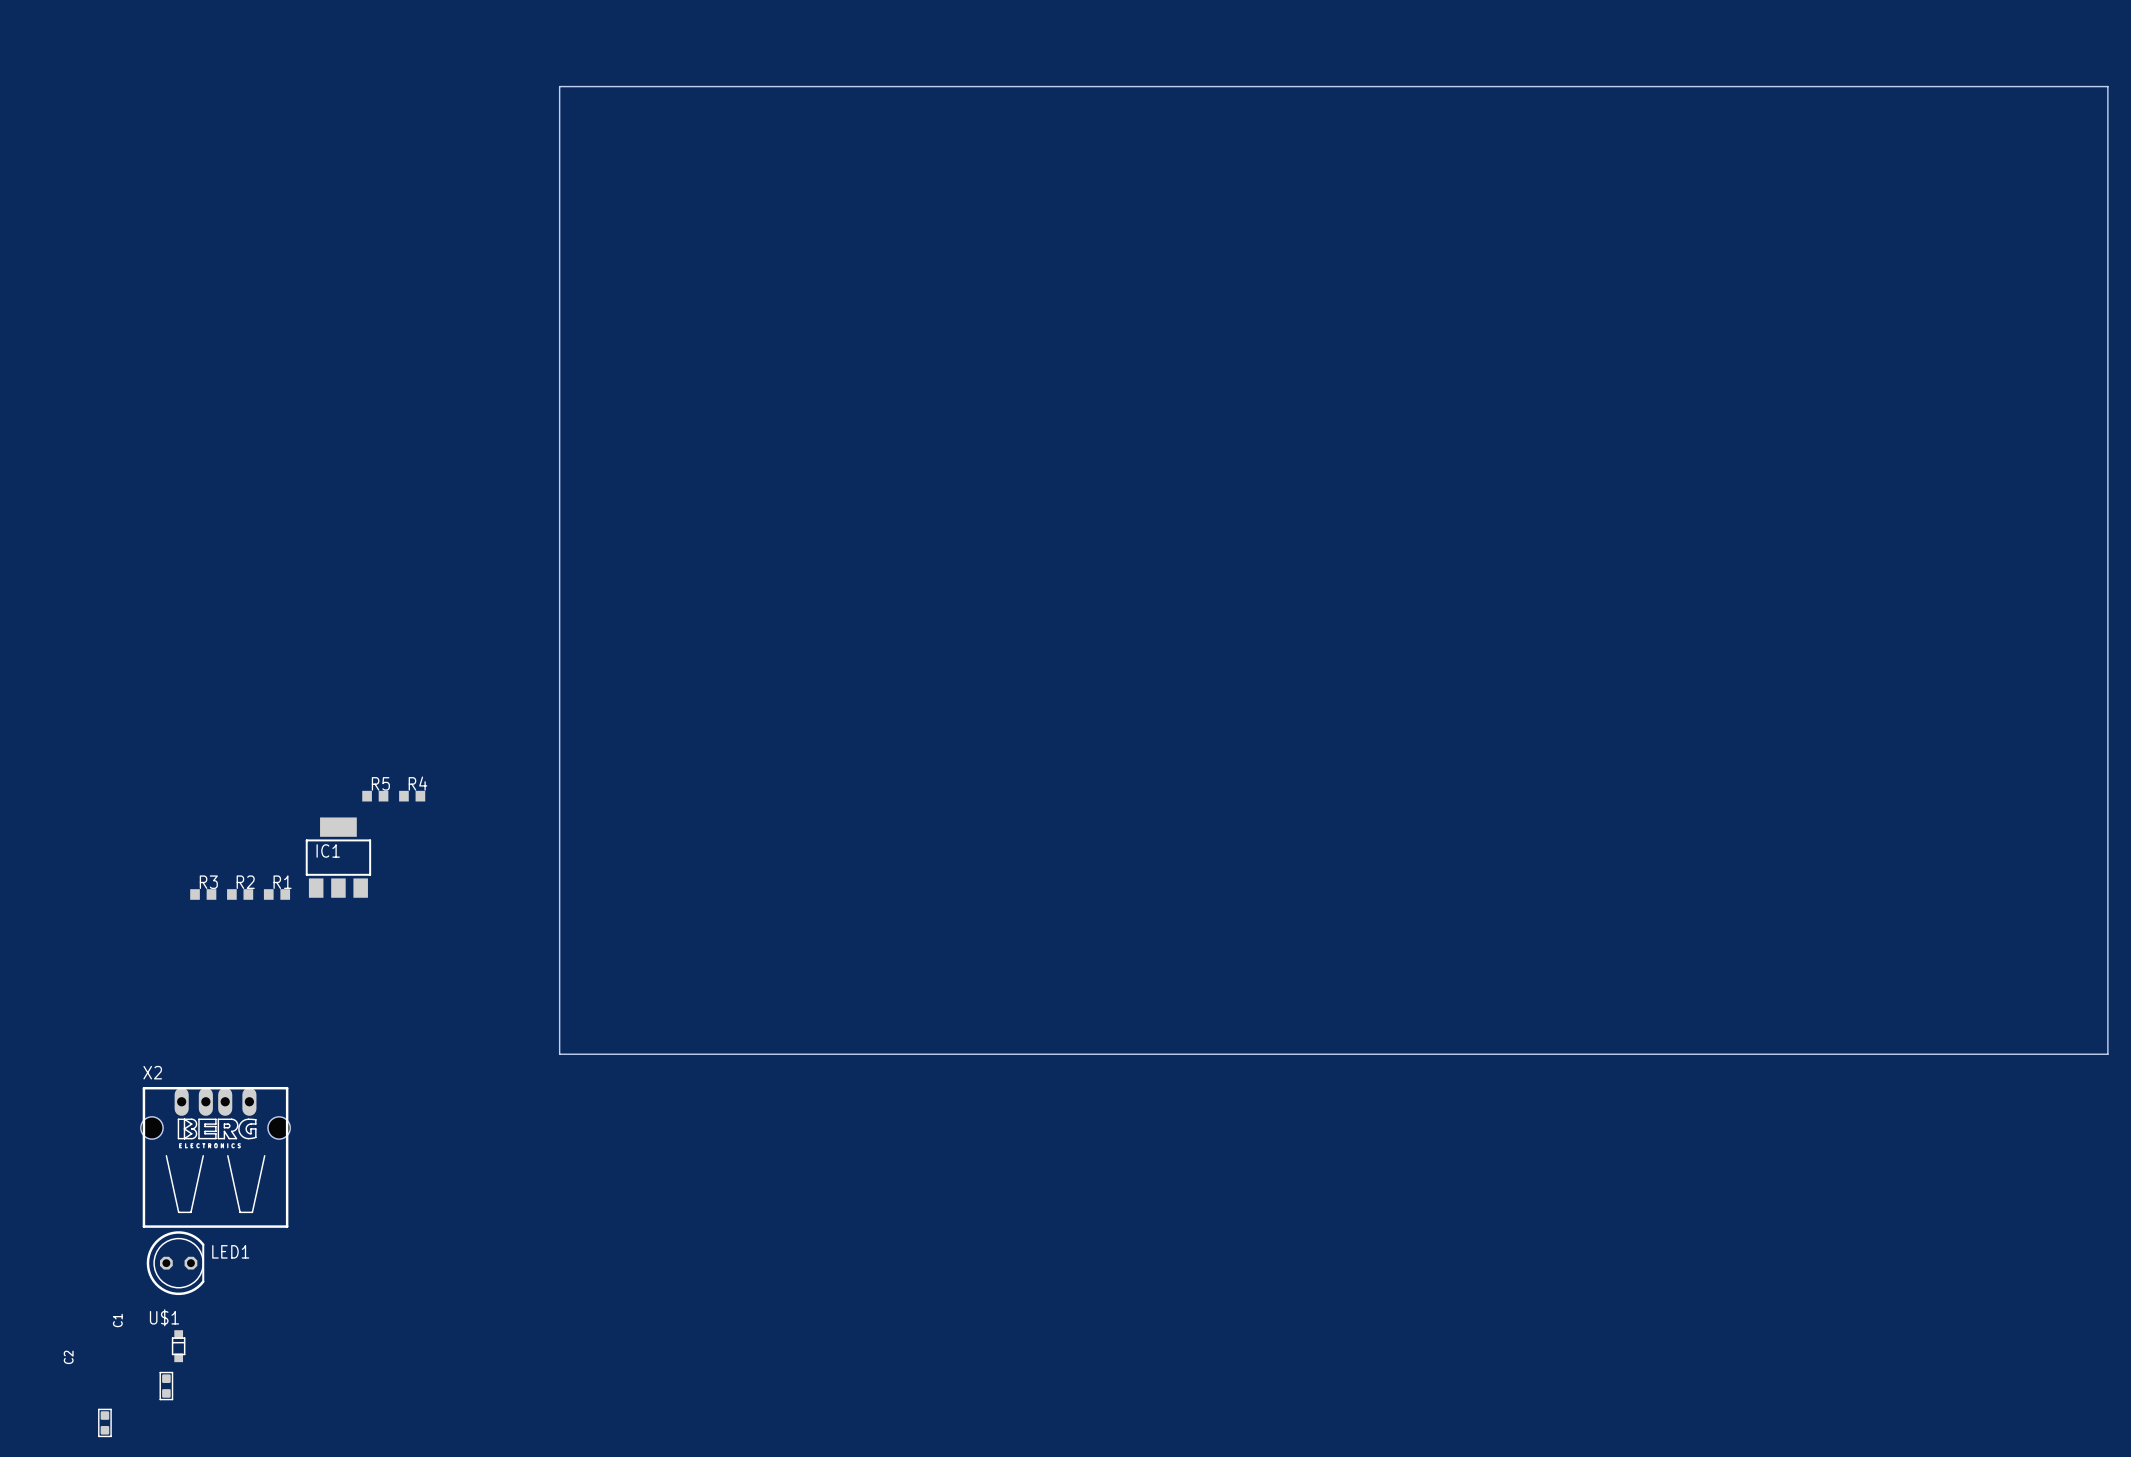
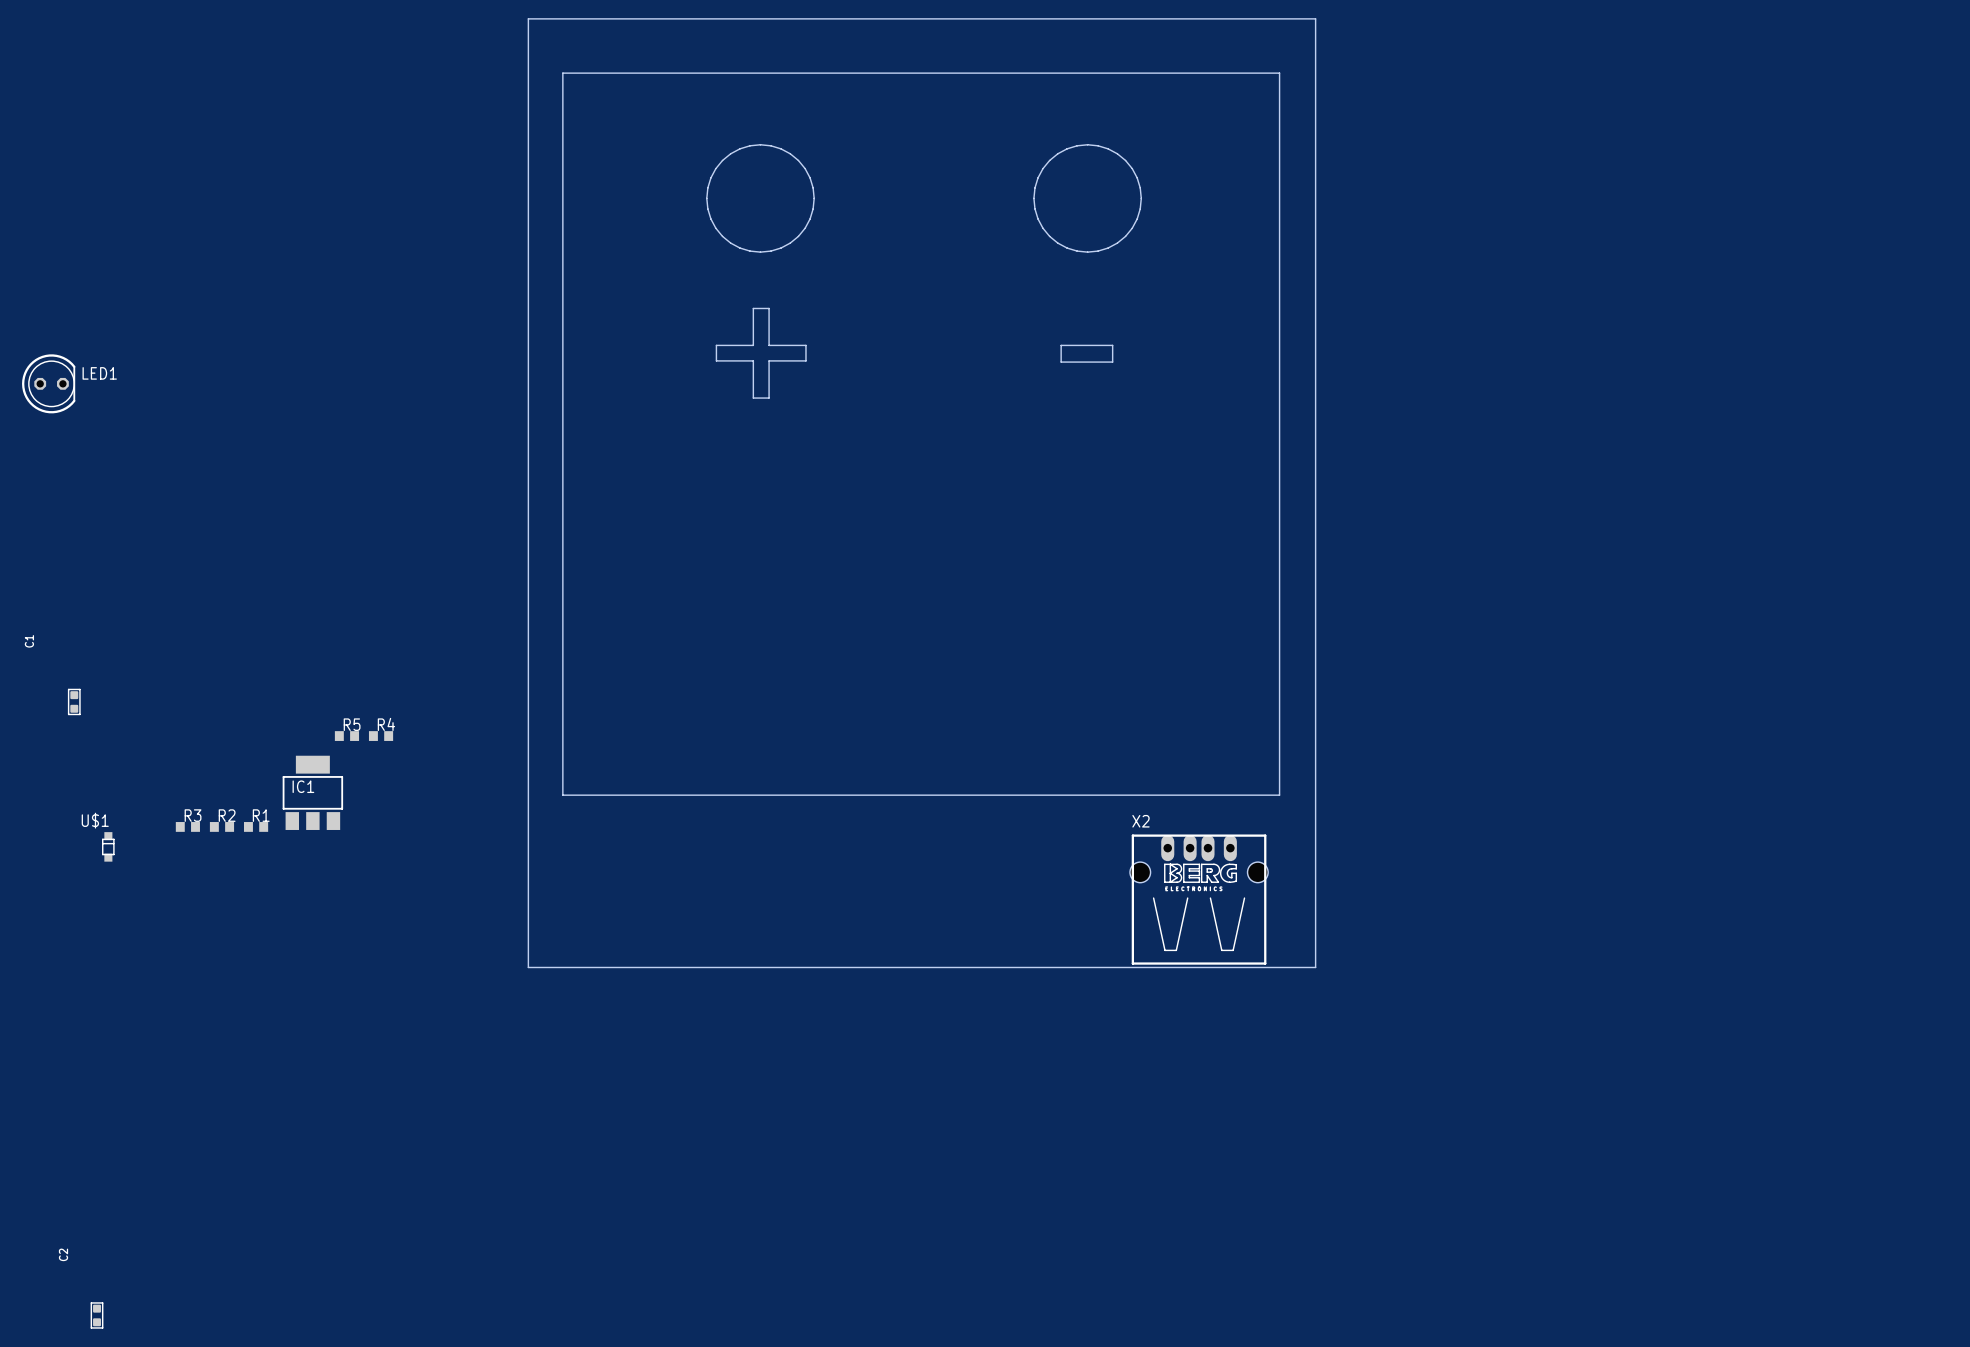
board edge: none -> (562, 73) (1279, 73) (1279, 795) (562, 795) (562, 73)
board edge: (559, 86) (2107, 86) (2107, 1054) (559, 1054) (559, 86) -> (528, 18) (528, 967) (1315, 967) (1315, 18) (528, 18)
board edge: none -> (760, 144) (739, 148) (722, 160) (710, 177) (706, 198) (710, 218) (722, 236) (739, 248) (760, 252) (781, 248) (798, 236) (810, 218) (814, 198) (810, 177) (798, 160) (781, 148) (760, 144)
board edge: none -> (1087, 144) (1067, 148) (1049, 160) (1038, 177) (1033, 198) (1038, 218) (1049, 236) (1067, 248) (1087, 252) (1108, 248) (1125, 236) (1137, 218) (1141, 198) (1137, 177) (1125, 160) (1108, 148) (1087, 144)
board edge: none -> (753, 308) (753, 345) (716, 345) (716, 360) (753, 360) (753, 398) (769, 398) (769, 360) (805, 360) (805, 345) (769, 345) (769, 308) (753, 308)
board edge: none -> (1061, 345) (1112, 345) (1112, 362) (1061, 362) (1061, 345)
X2 position: (215, 1157) -> (1199, 899)
LED1 position: (175, 1263) -> (48, 383)
U$1 position: (178, 1346) -> (108, 846)
C1 position: (166, 1386) -> (74, 701)

